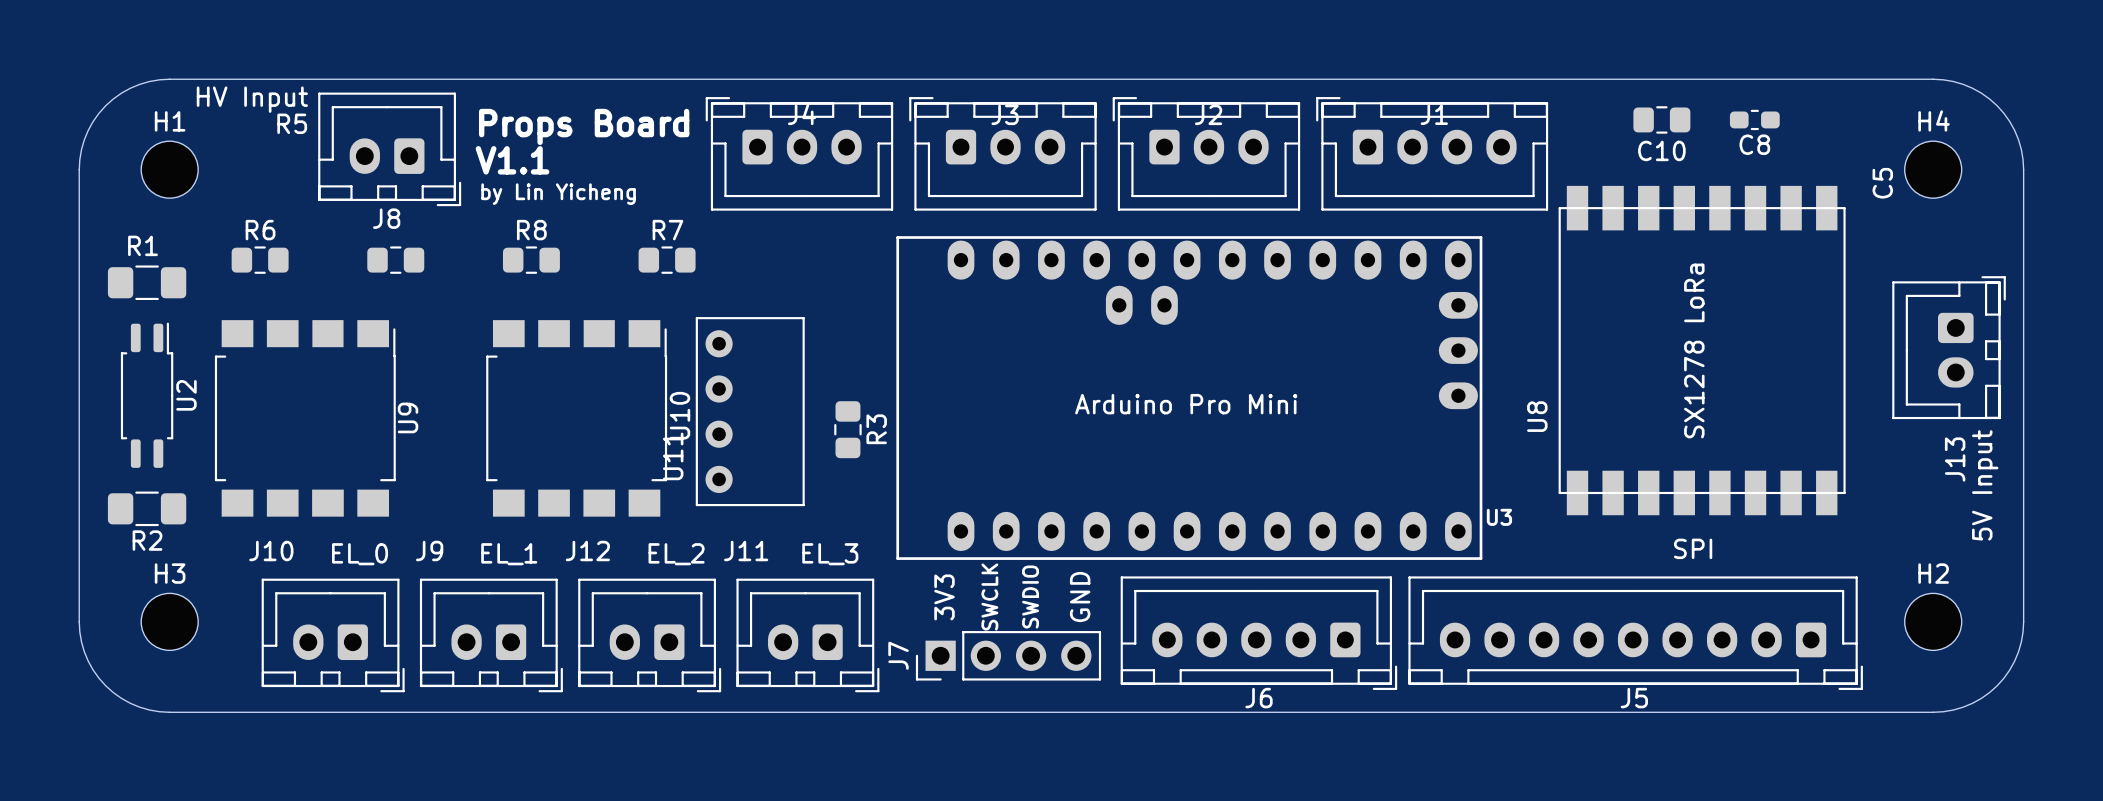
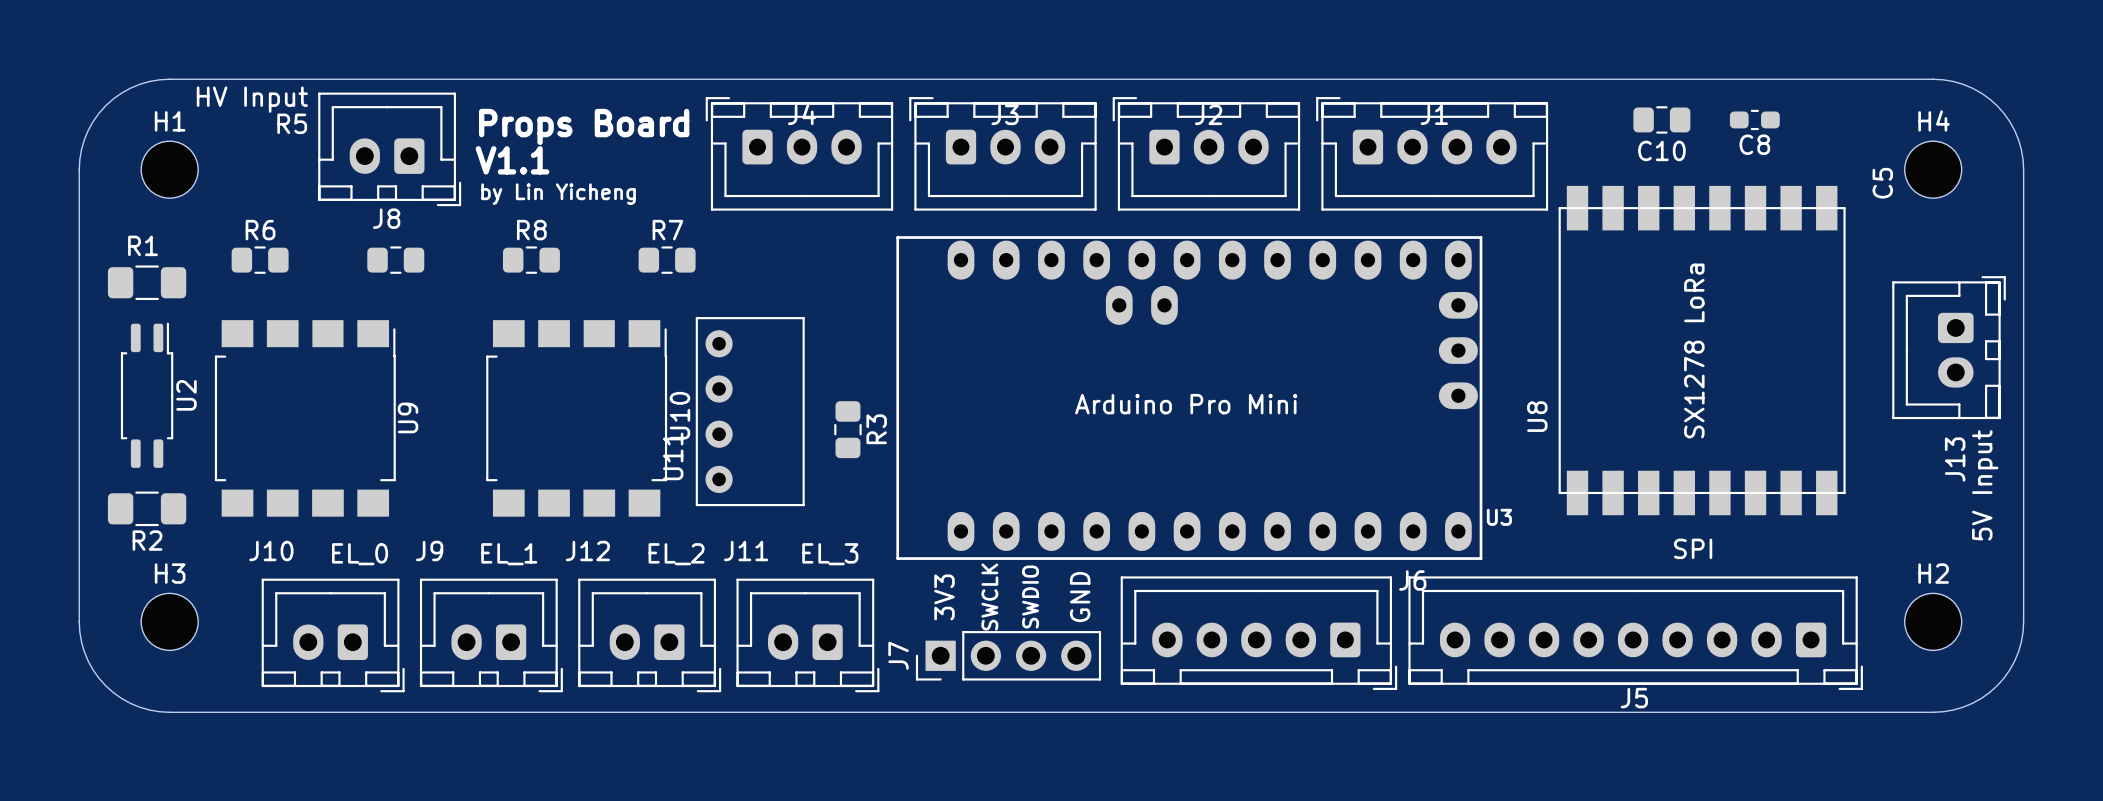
J6 name position: J6 (1259, 698) -> J6 (1412, 580)

